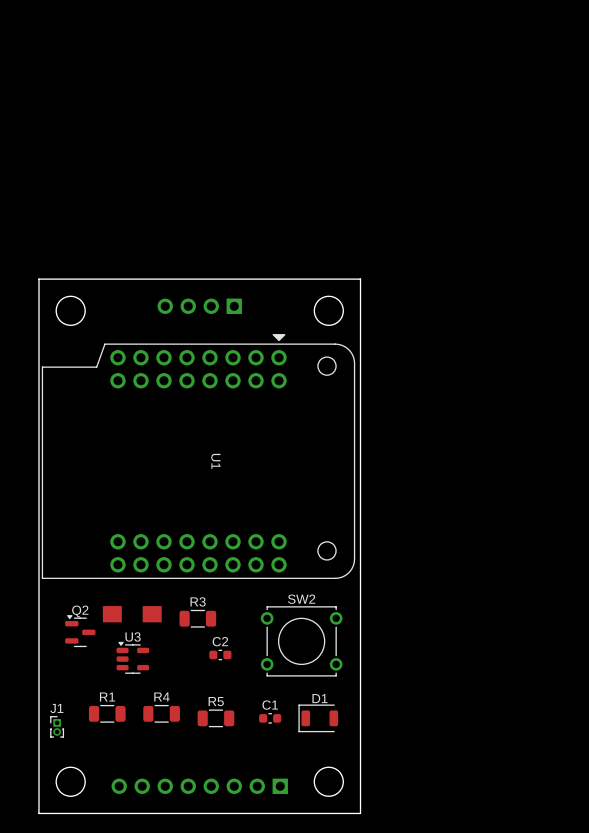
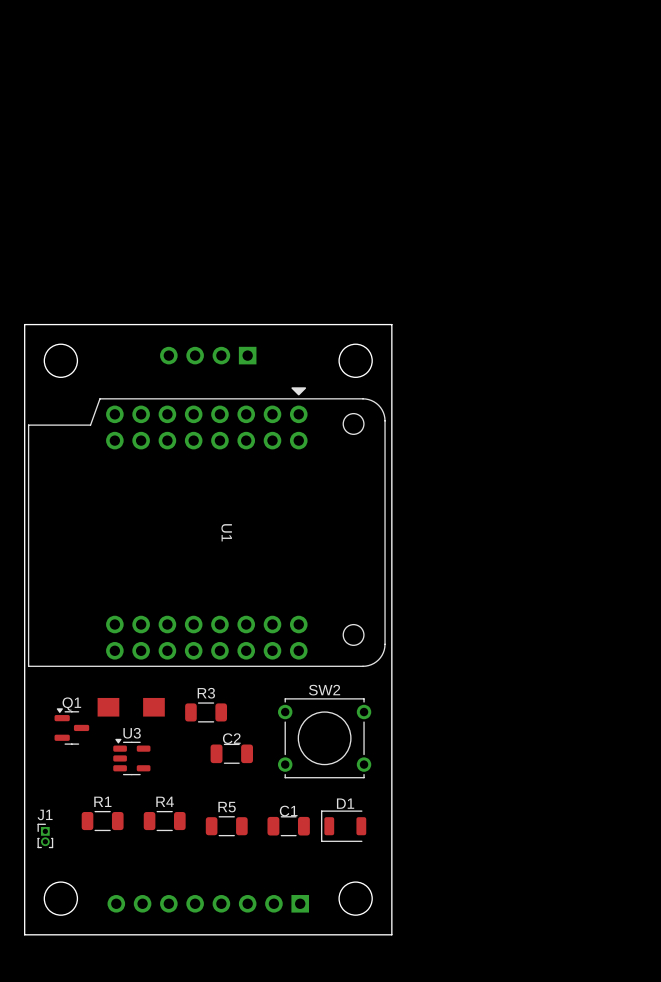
Q2 name: Q2 (80, 611) -> Q1 (71, 704)
C2 footprint: [209, 649, 232, 661] -> [210, 743, 253, 764]
C1 footprint: [259, 713, 282, 724] -> [267, 816, 310, 837]

